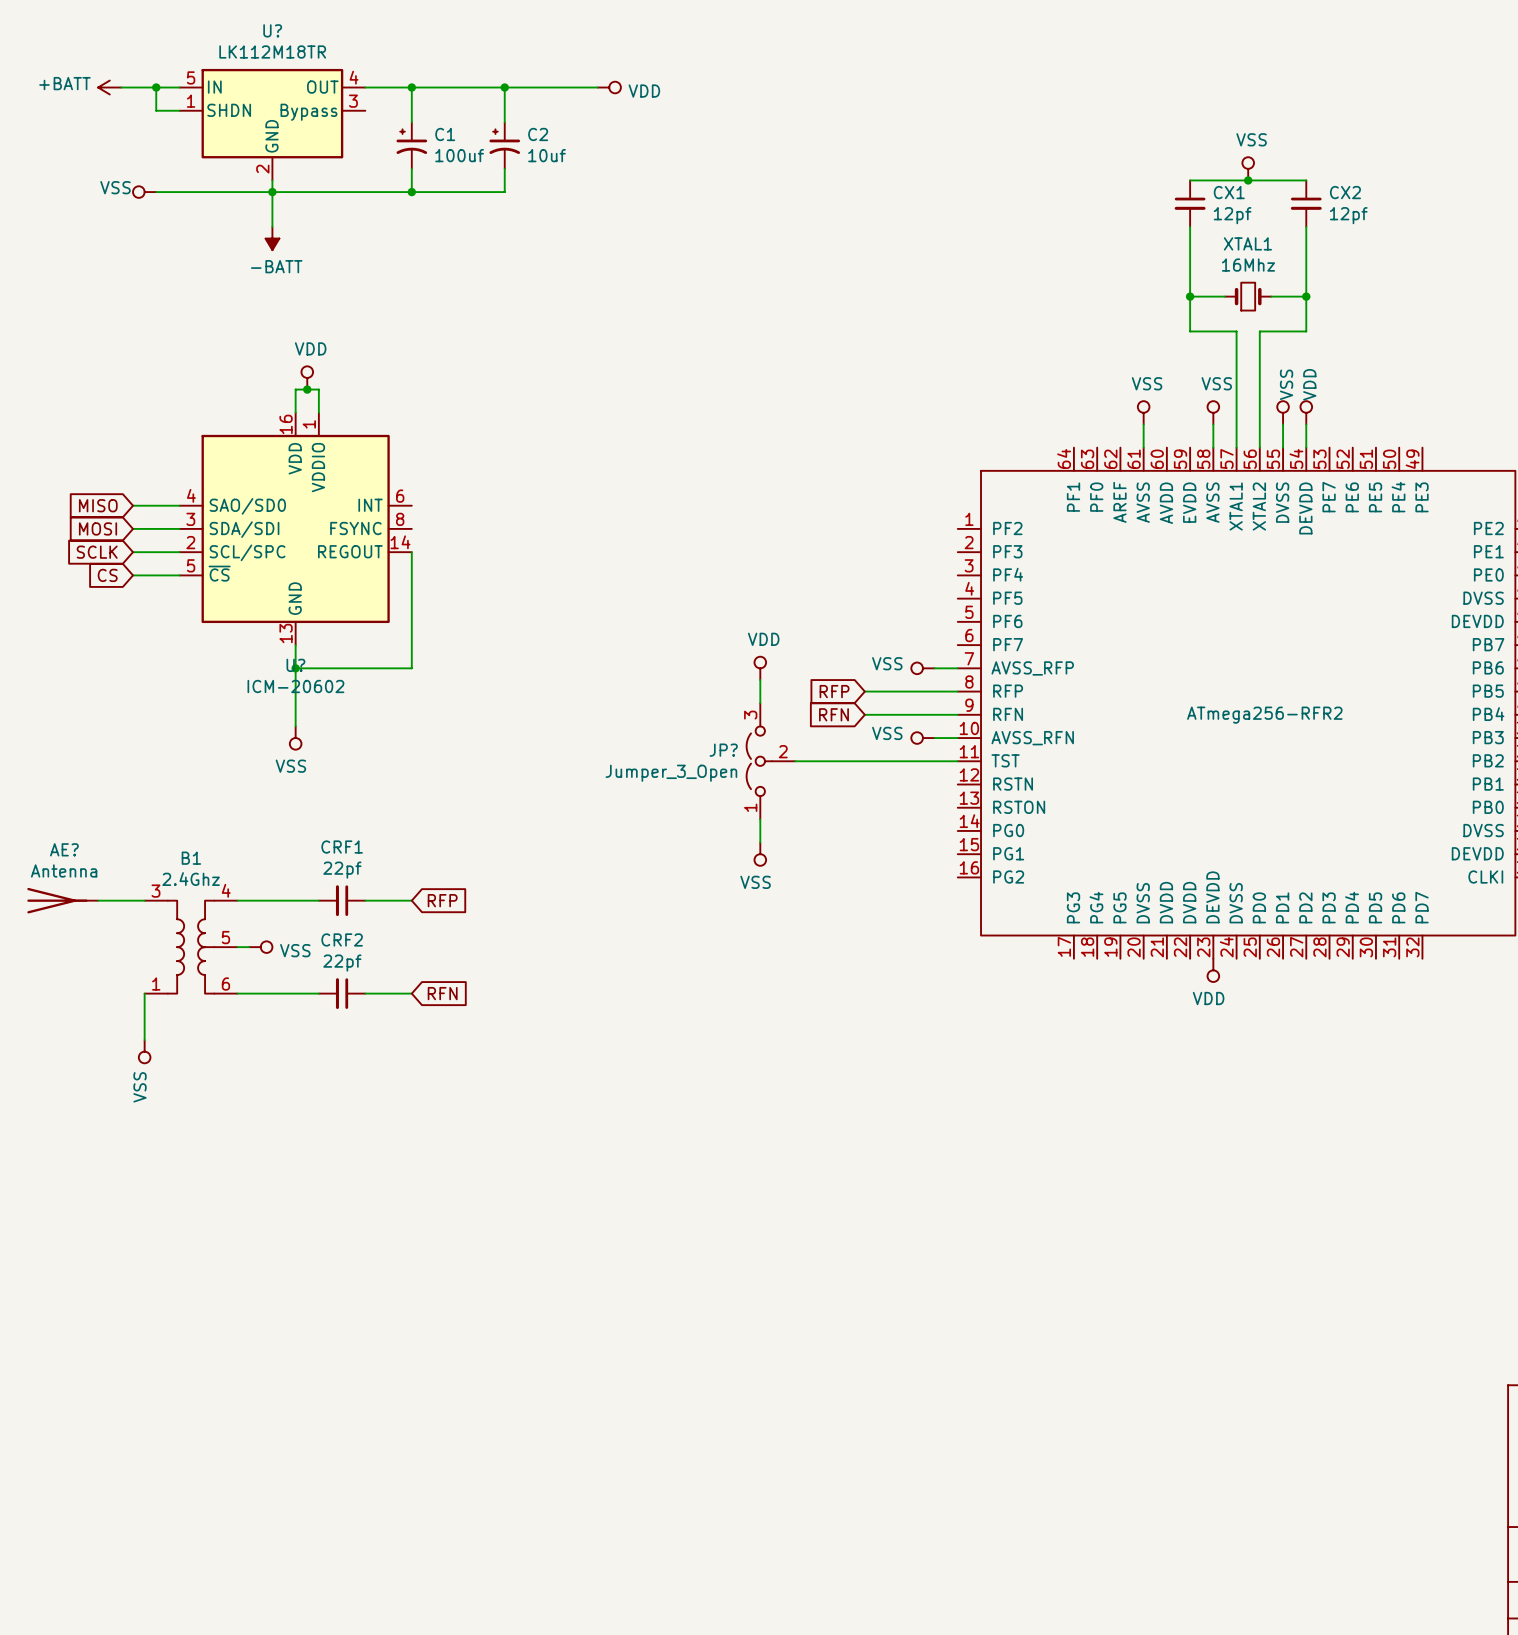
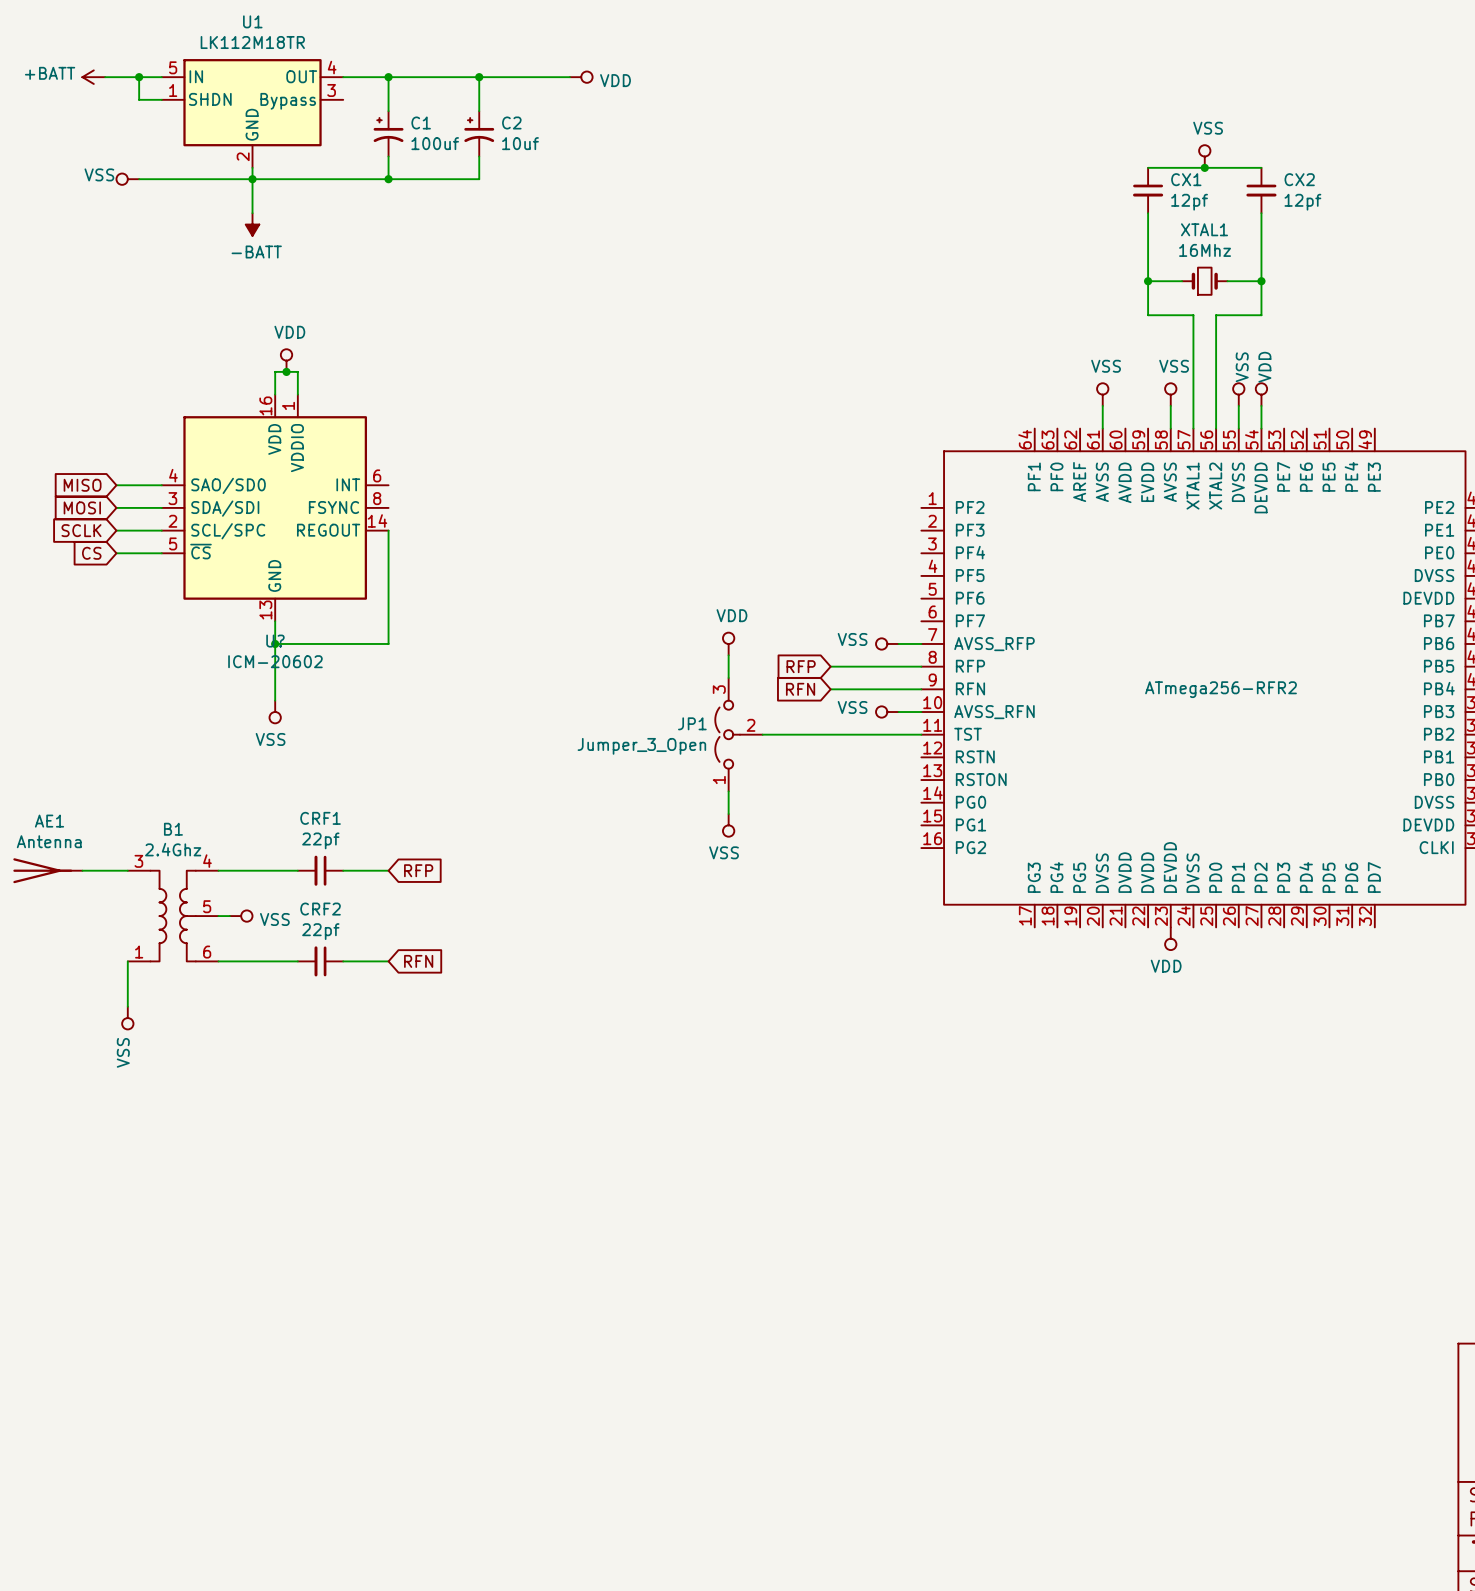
U? name: U? (272, 30) -> U1 (252, 21)
JP? name: JP? (723, 750) -> JP1 (692, 723)
AE? name: AE? (64, 849) -> AE1 (49, 821)

